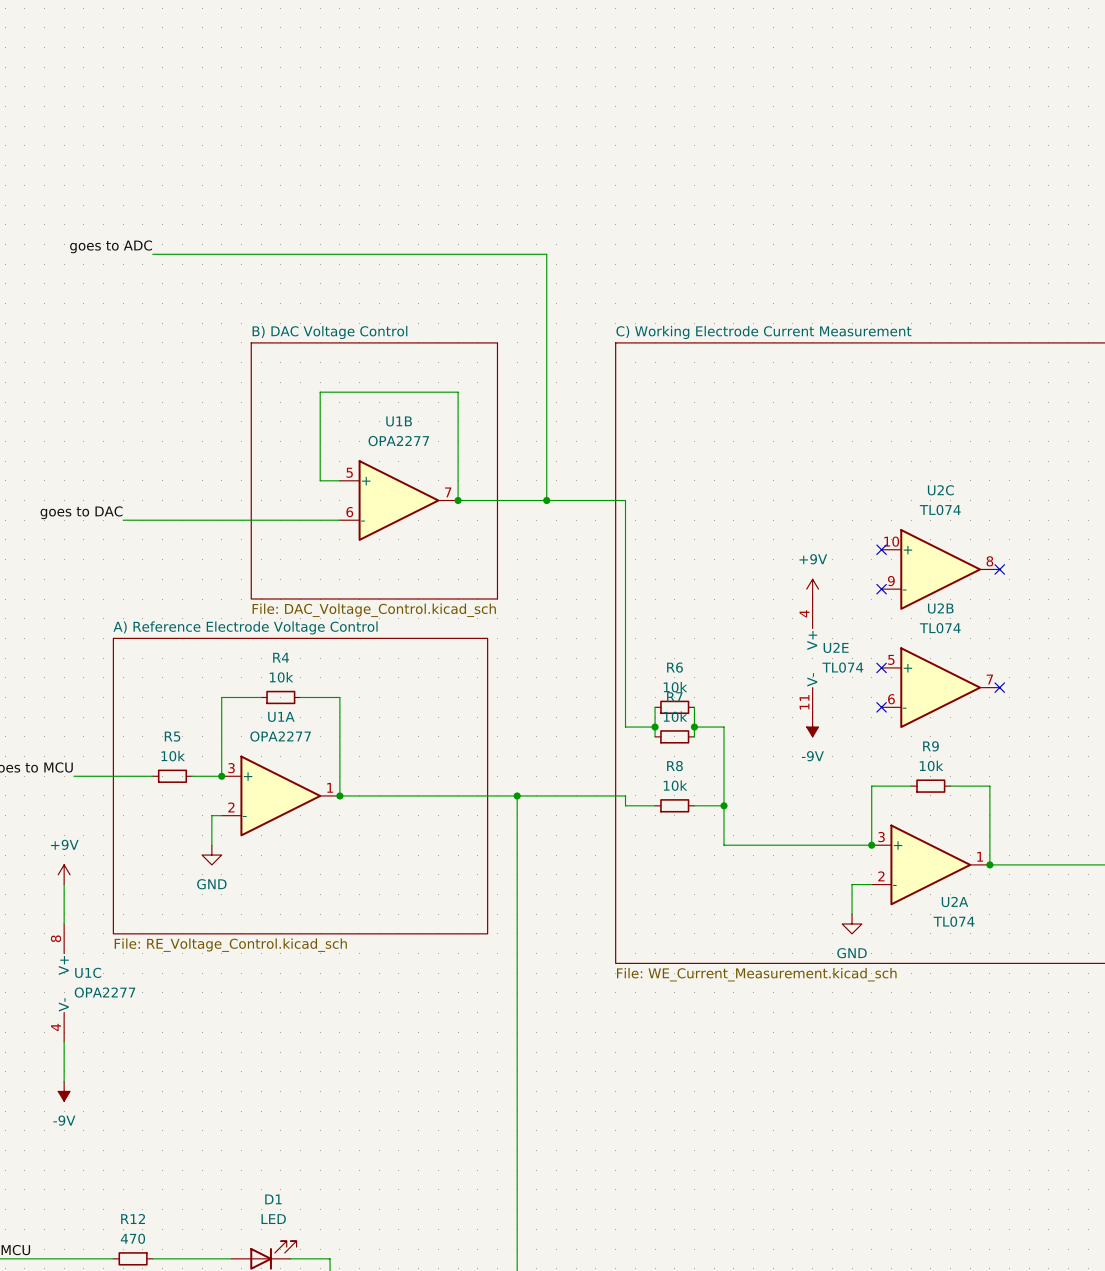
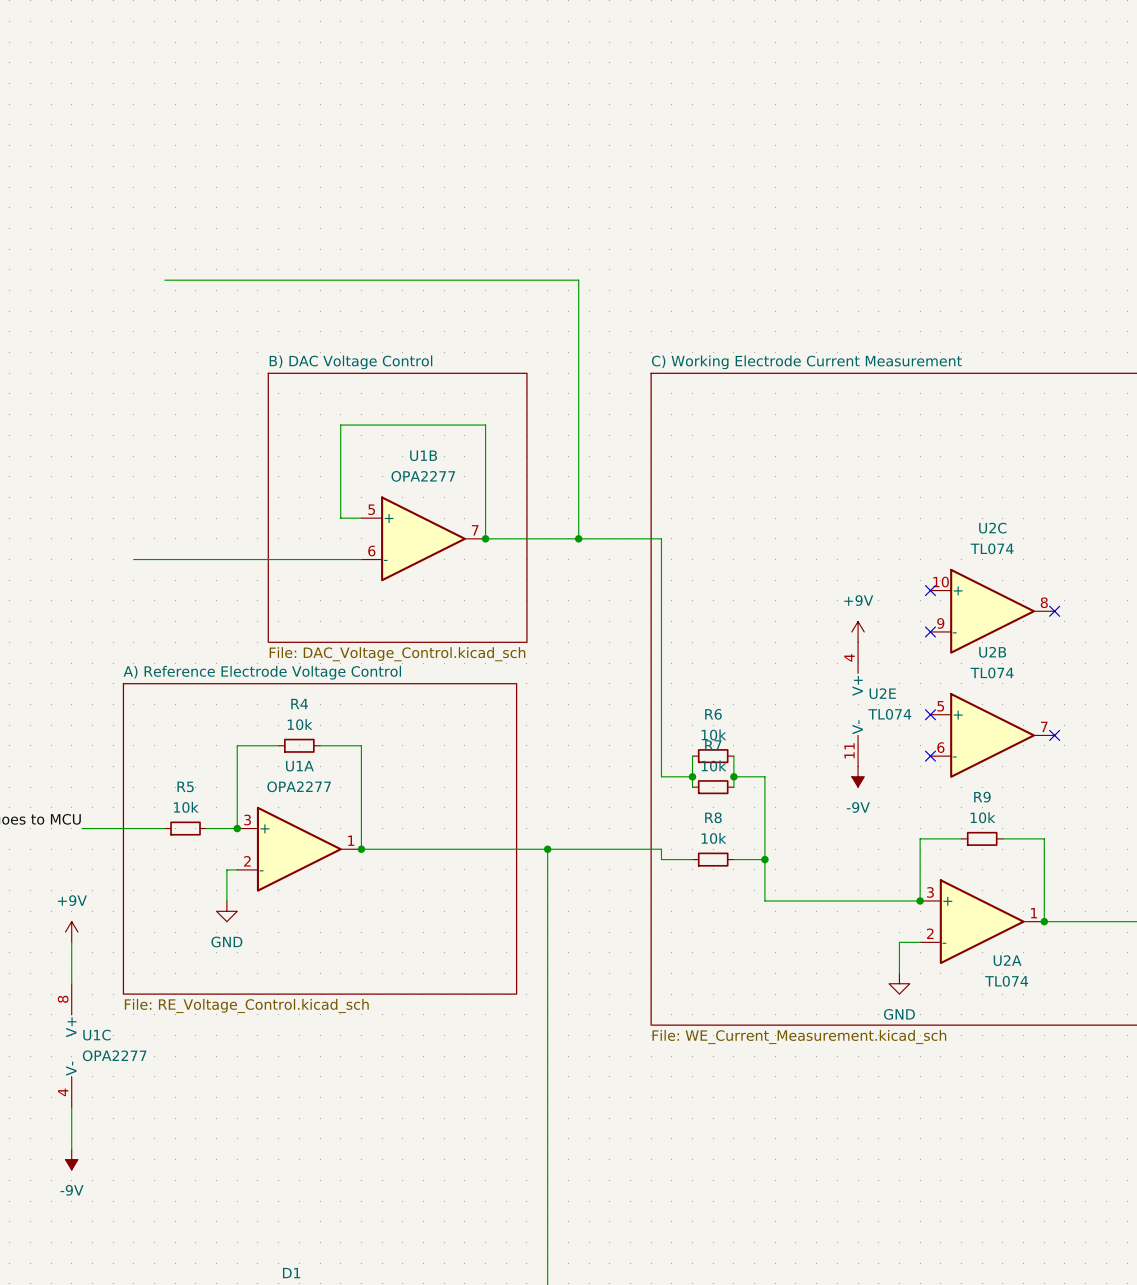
label: goes to ADC (111, 246) -> none
label: goes to DAC (81, 512) -> none

